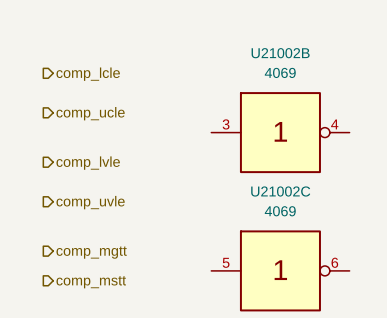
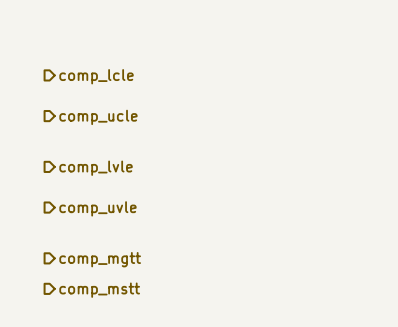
U21002B: 4069 (280, 132) -> none
U21002C: 4069 (280, 270) -> none

